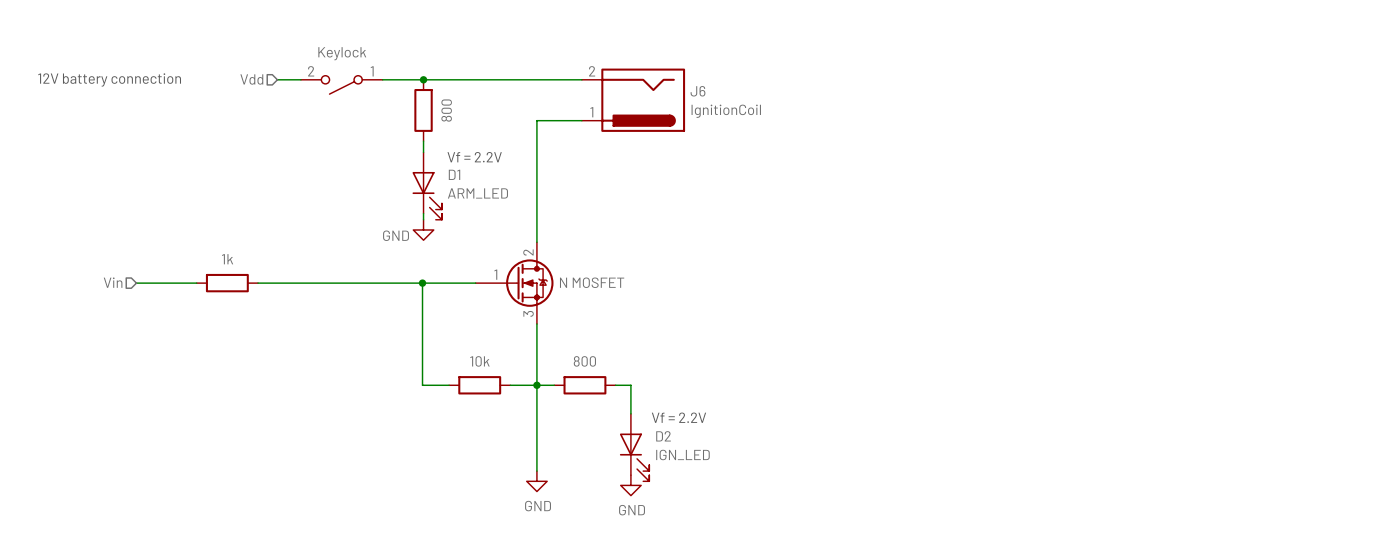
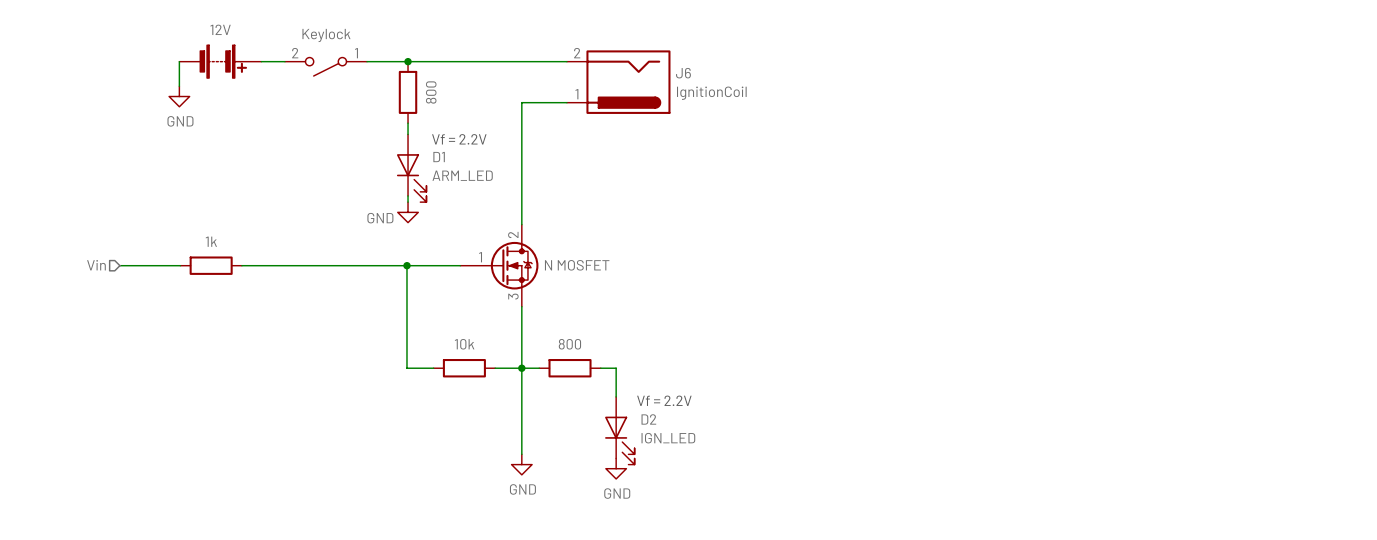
text: 12V battery connection (109, 79) -> none
wire: none -> (179, 61) (179, 86)
part: none -> 12V (220, 61)
hierarchical label: Vdd (251, 79) -> none
power symbol: none -> GND (179, 96)

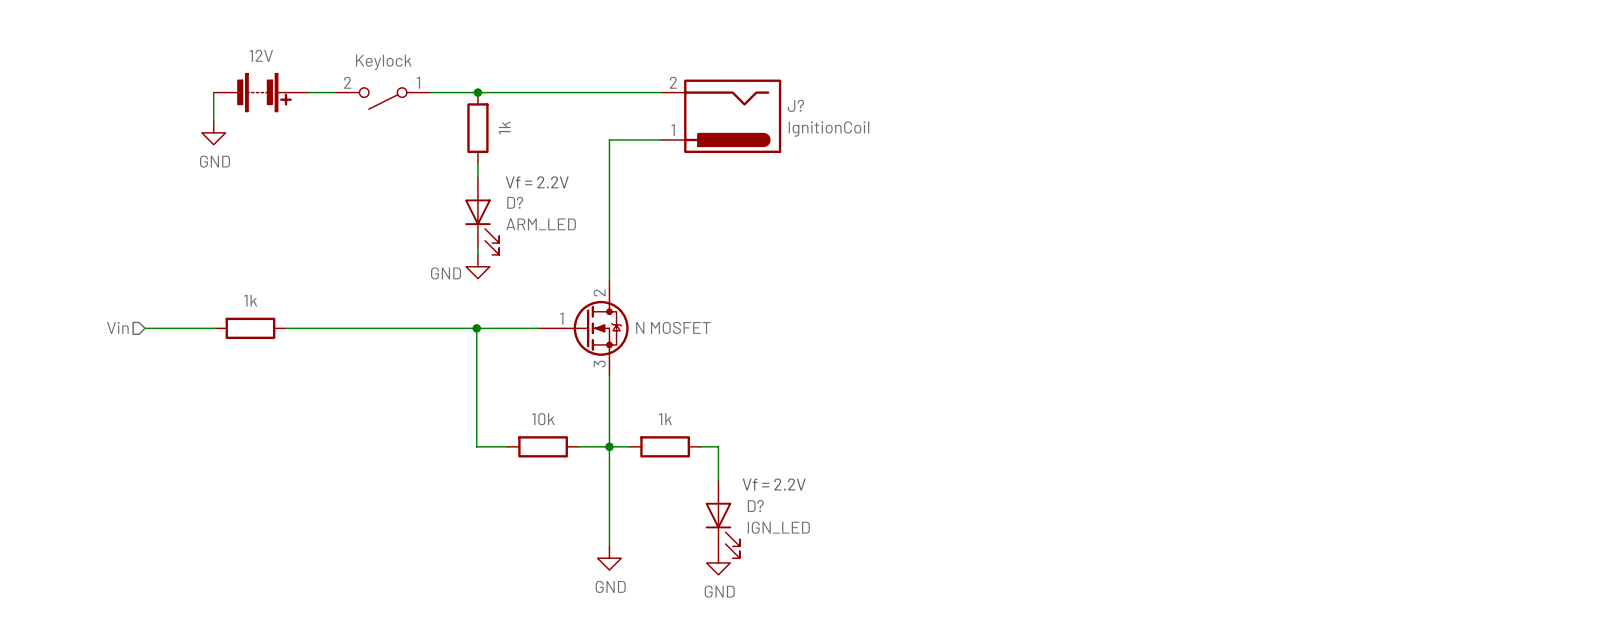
J6 name: J6 (683, 73) -> J? (795, 105)
part value: 800 (431, 92) -> 1k (504, 127)
D1 name: D1 (439, 157) -> D? (515, 202)
part value: 800 (569, 344) -> 1k (665, 419)
D2 name: D2 (648, 419) -> D? (755, 506)

